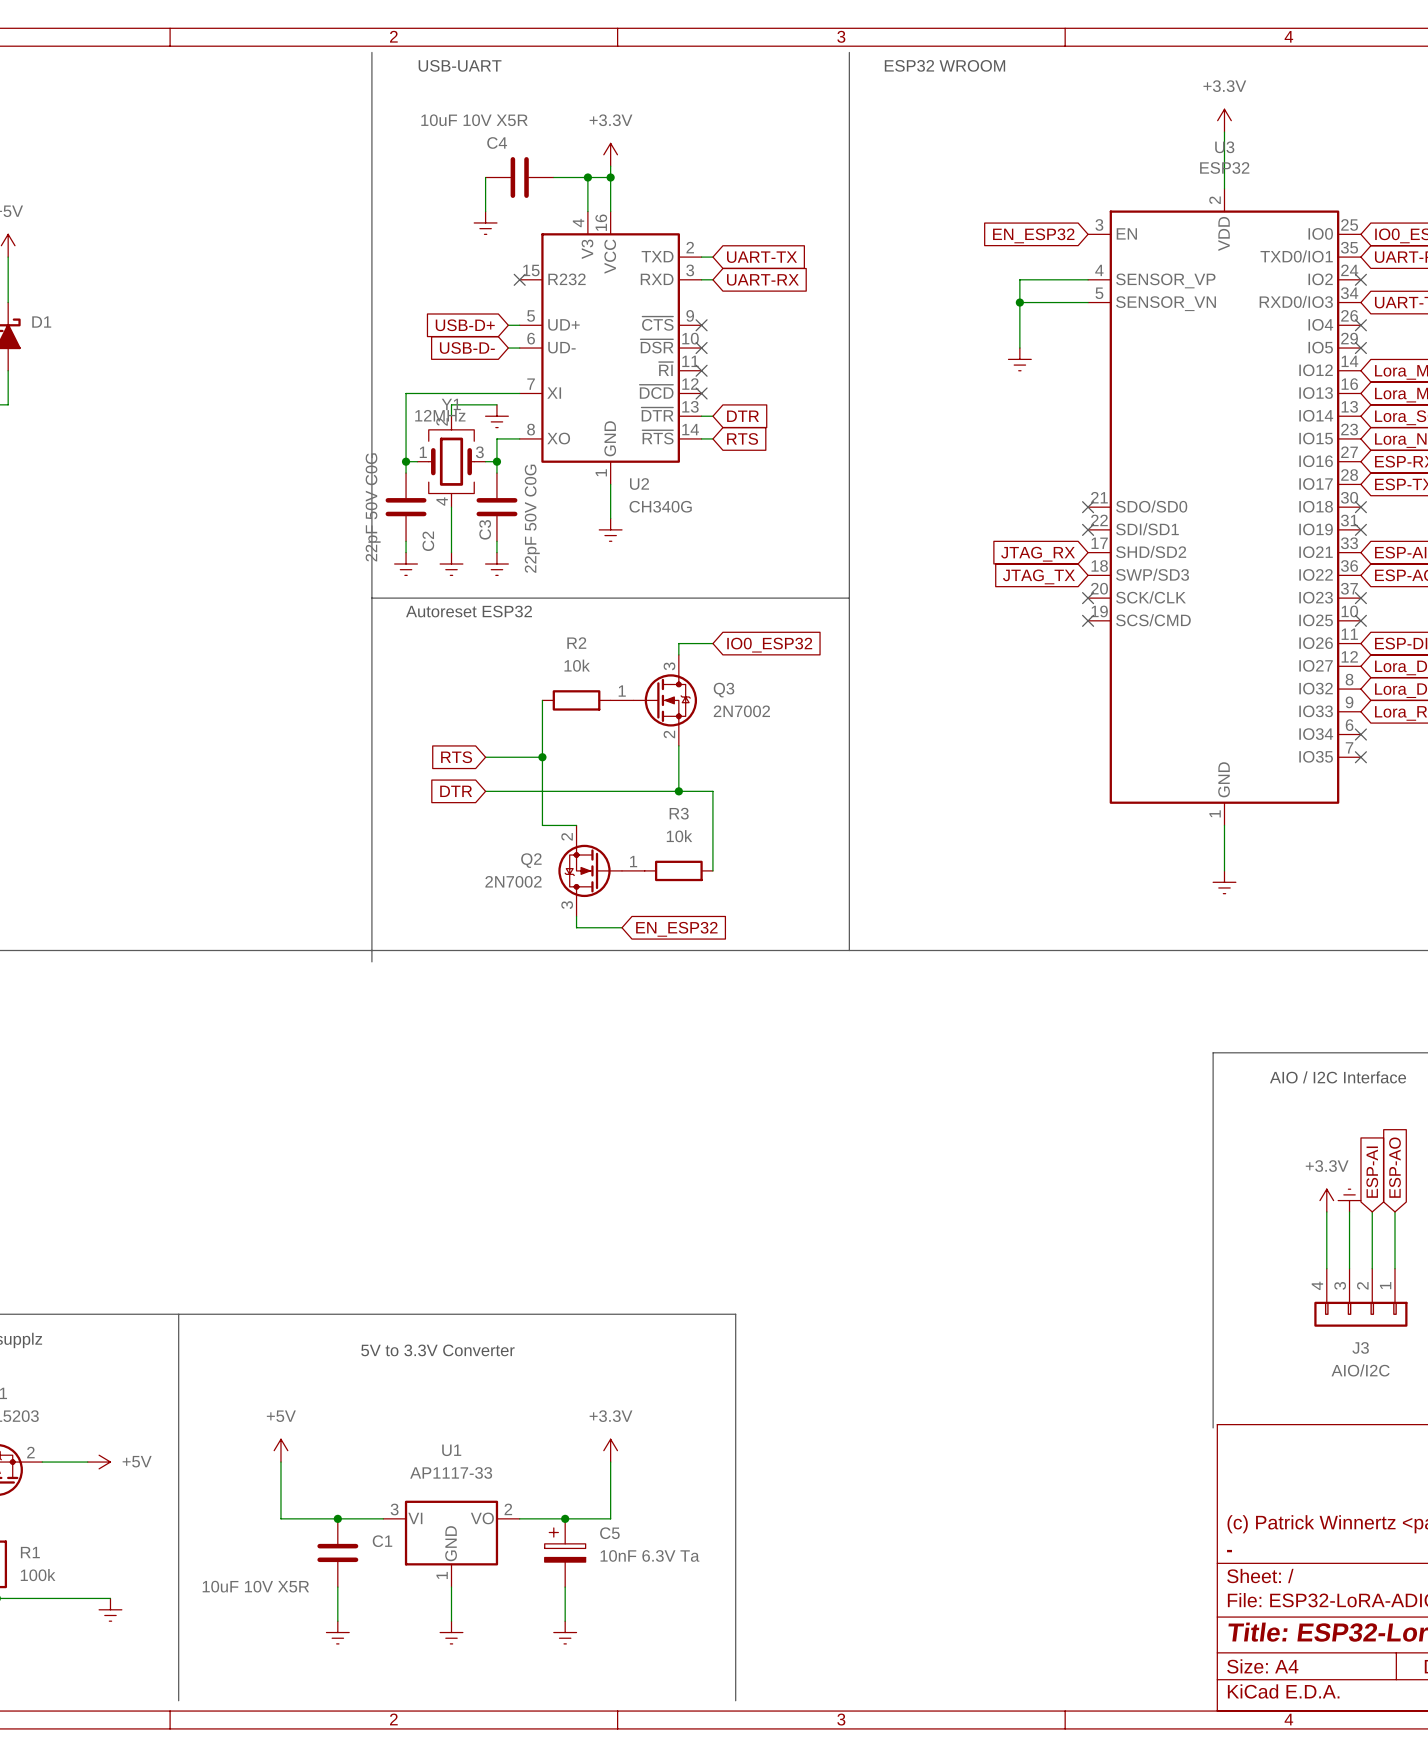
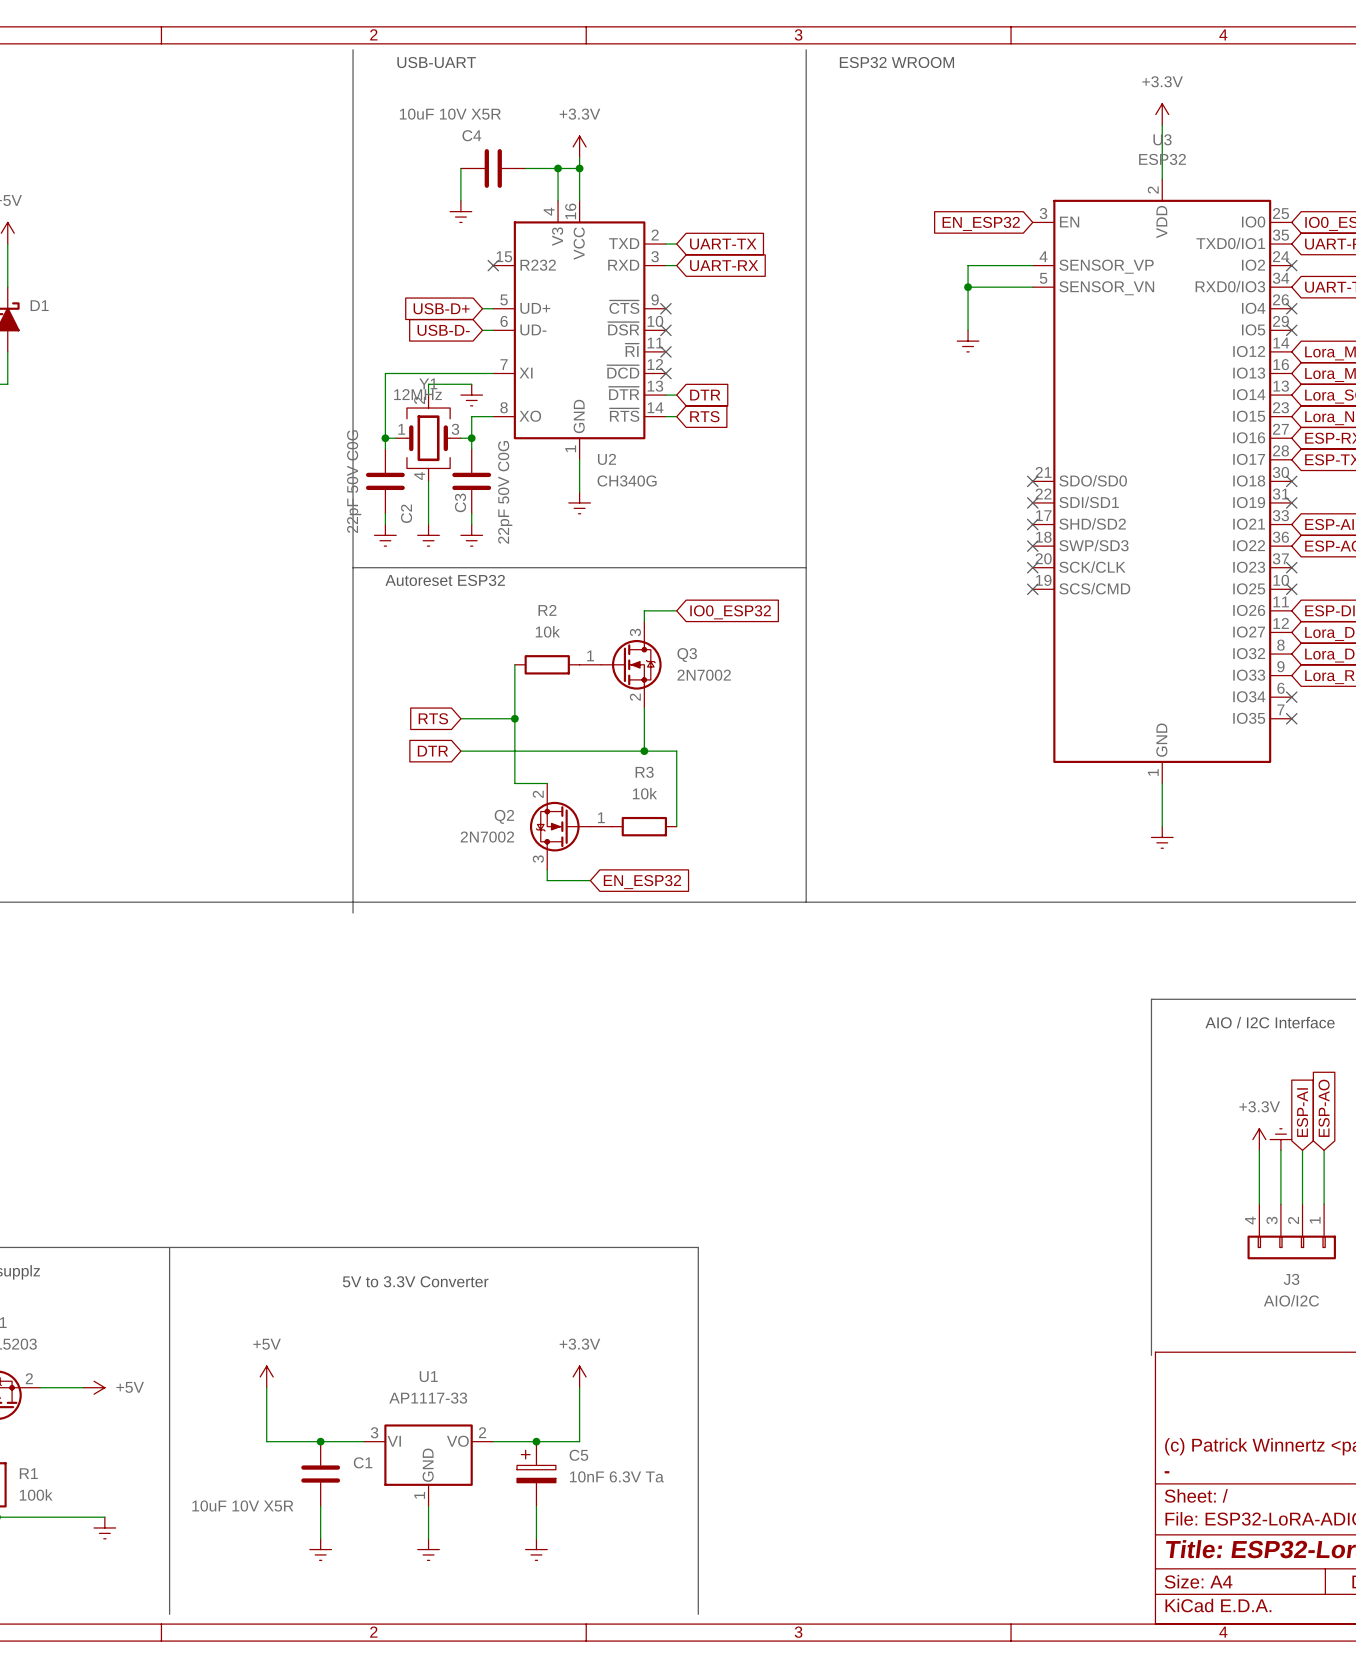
no-connect mark: none -> (1032, 524)
global label: JTAG_RX (1038, 554) -> none
no-connect mark: none -> (1032, 546)
global label: JTAG_TX (1038, 576) -> none

